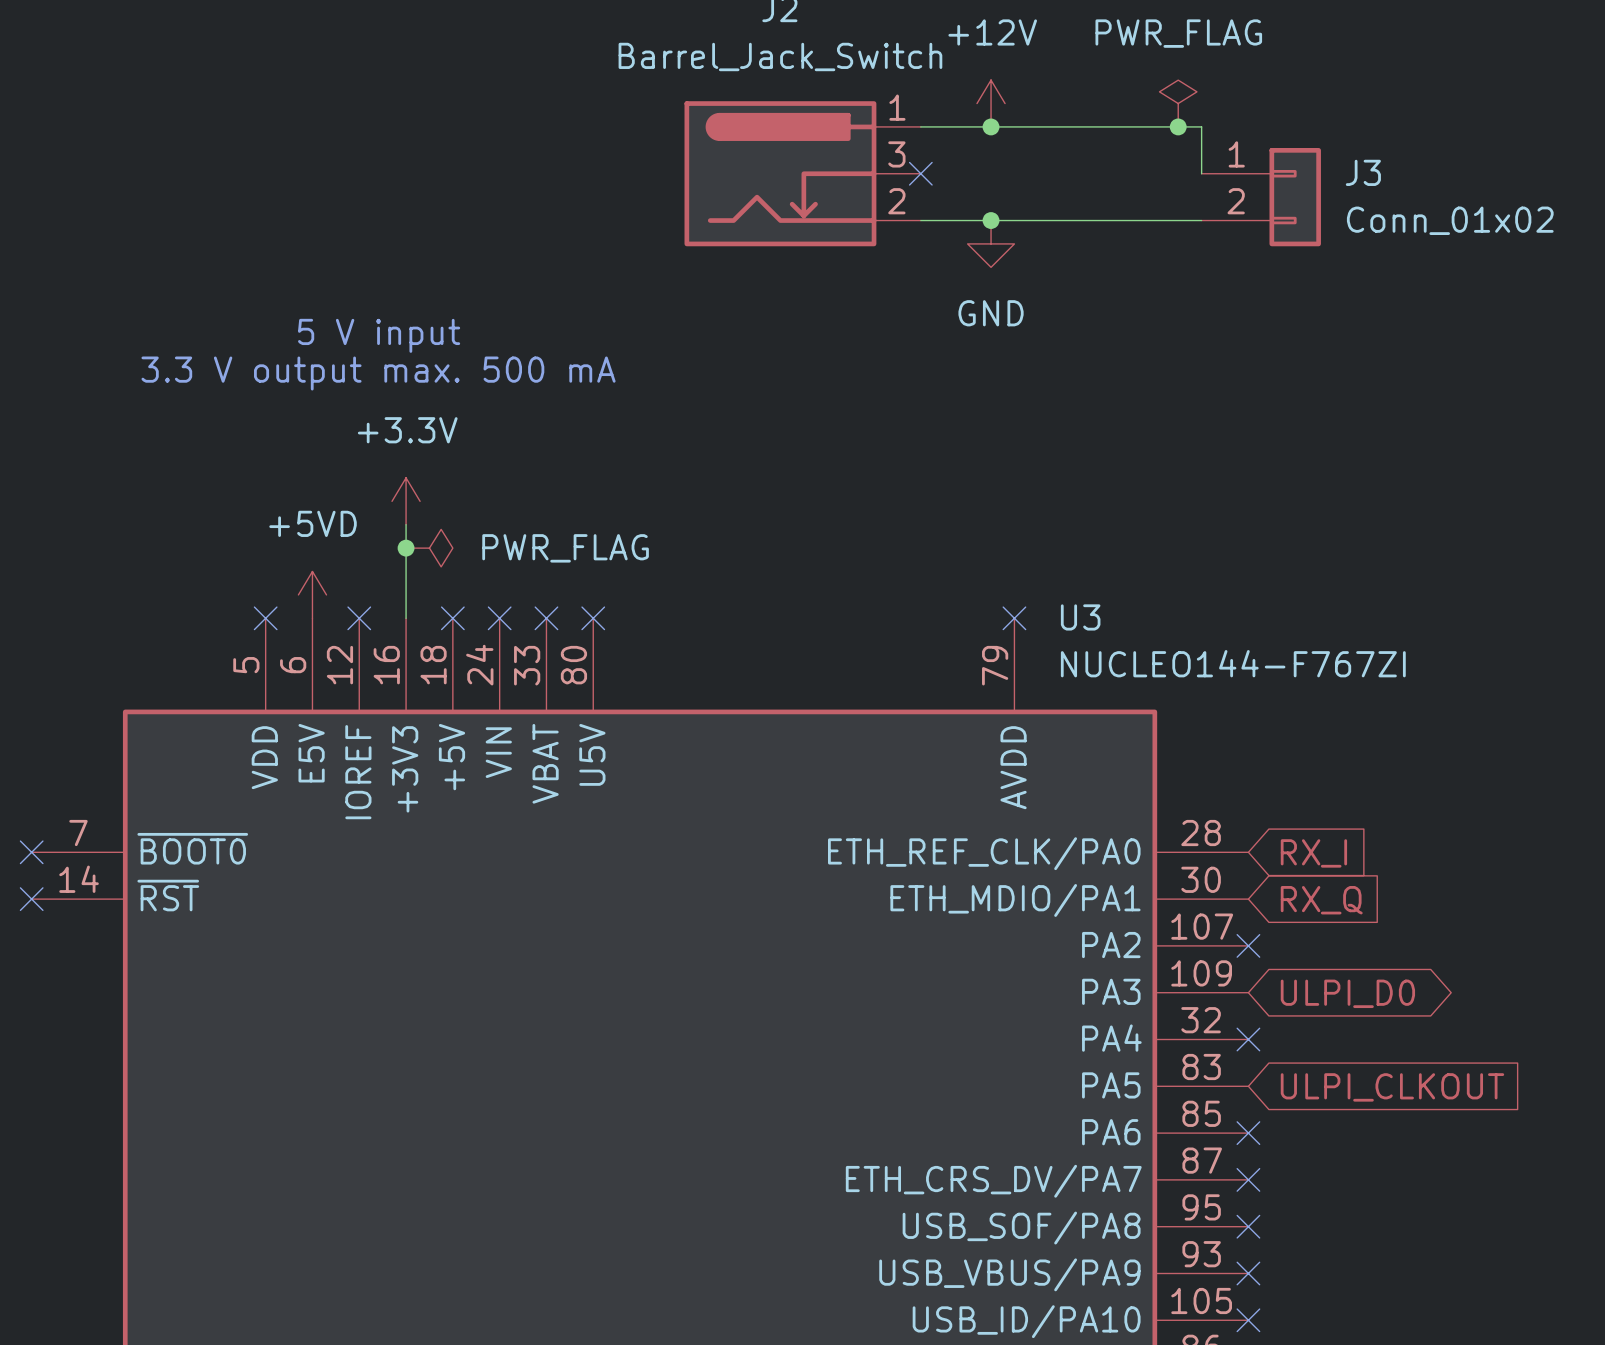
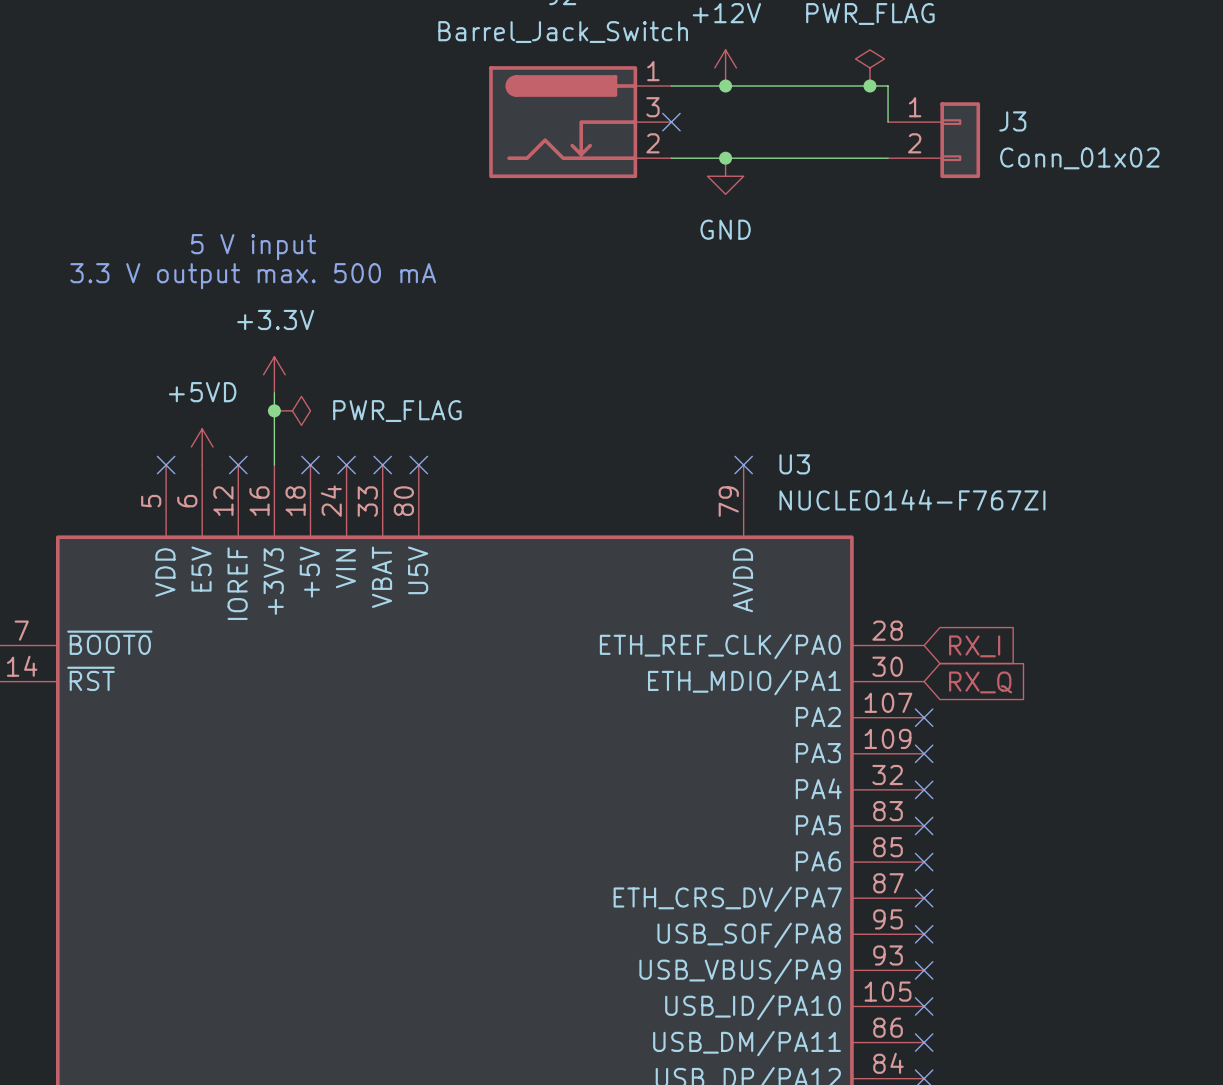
no-connect mark: none -> (924, 753)
global label: ULPI_D0 (1347, 993) -> none
no-connect mark: none -> (924, 825)
global label: ULPI_CLKOUT (1392, 1087) -> none

